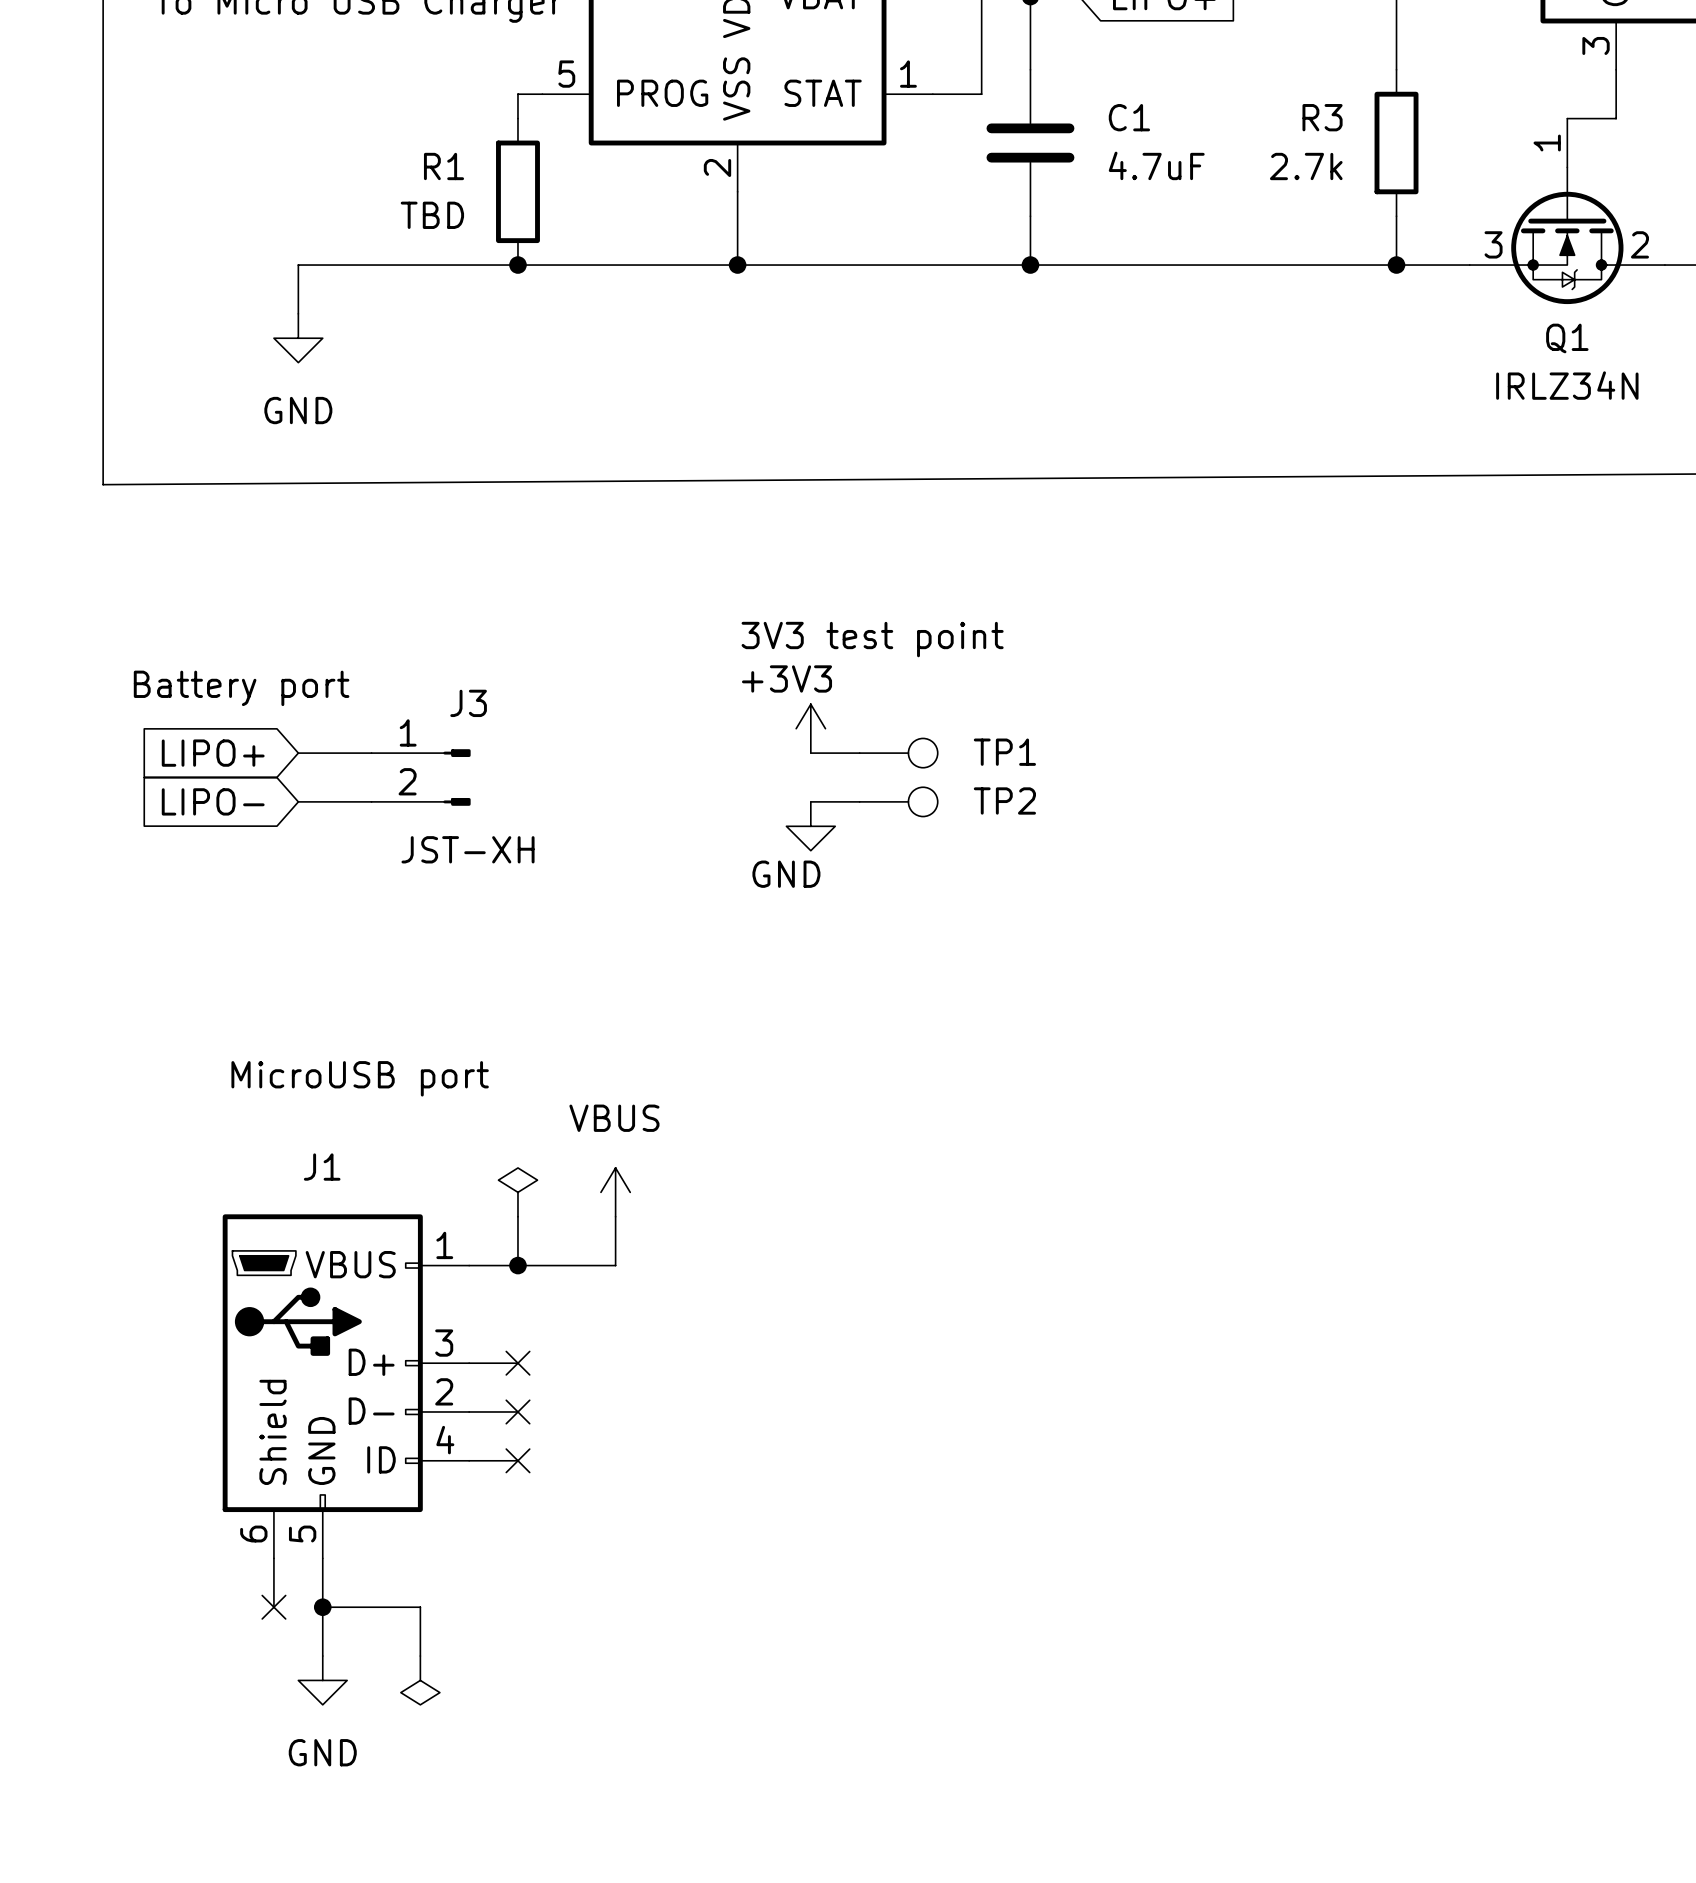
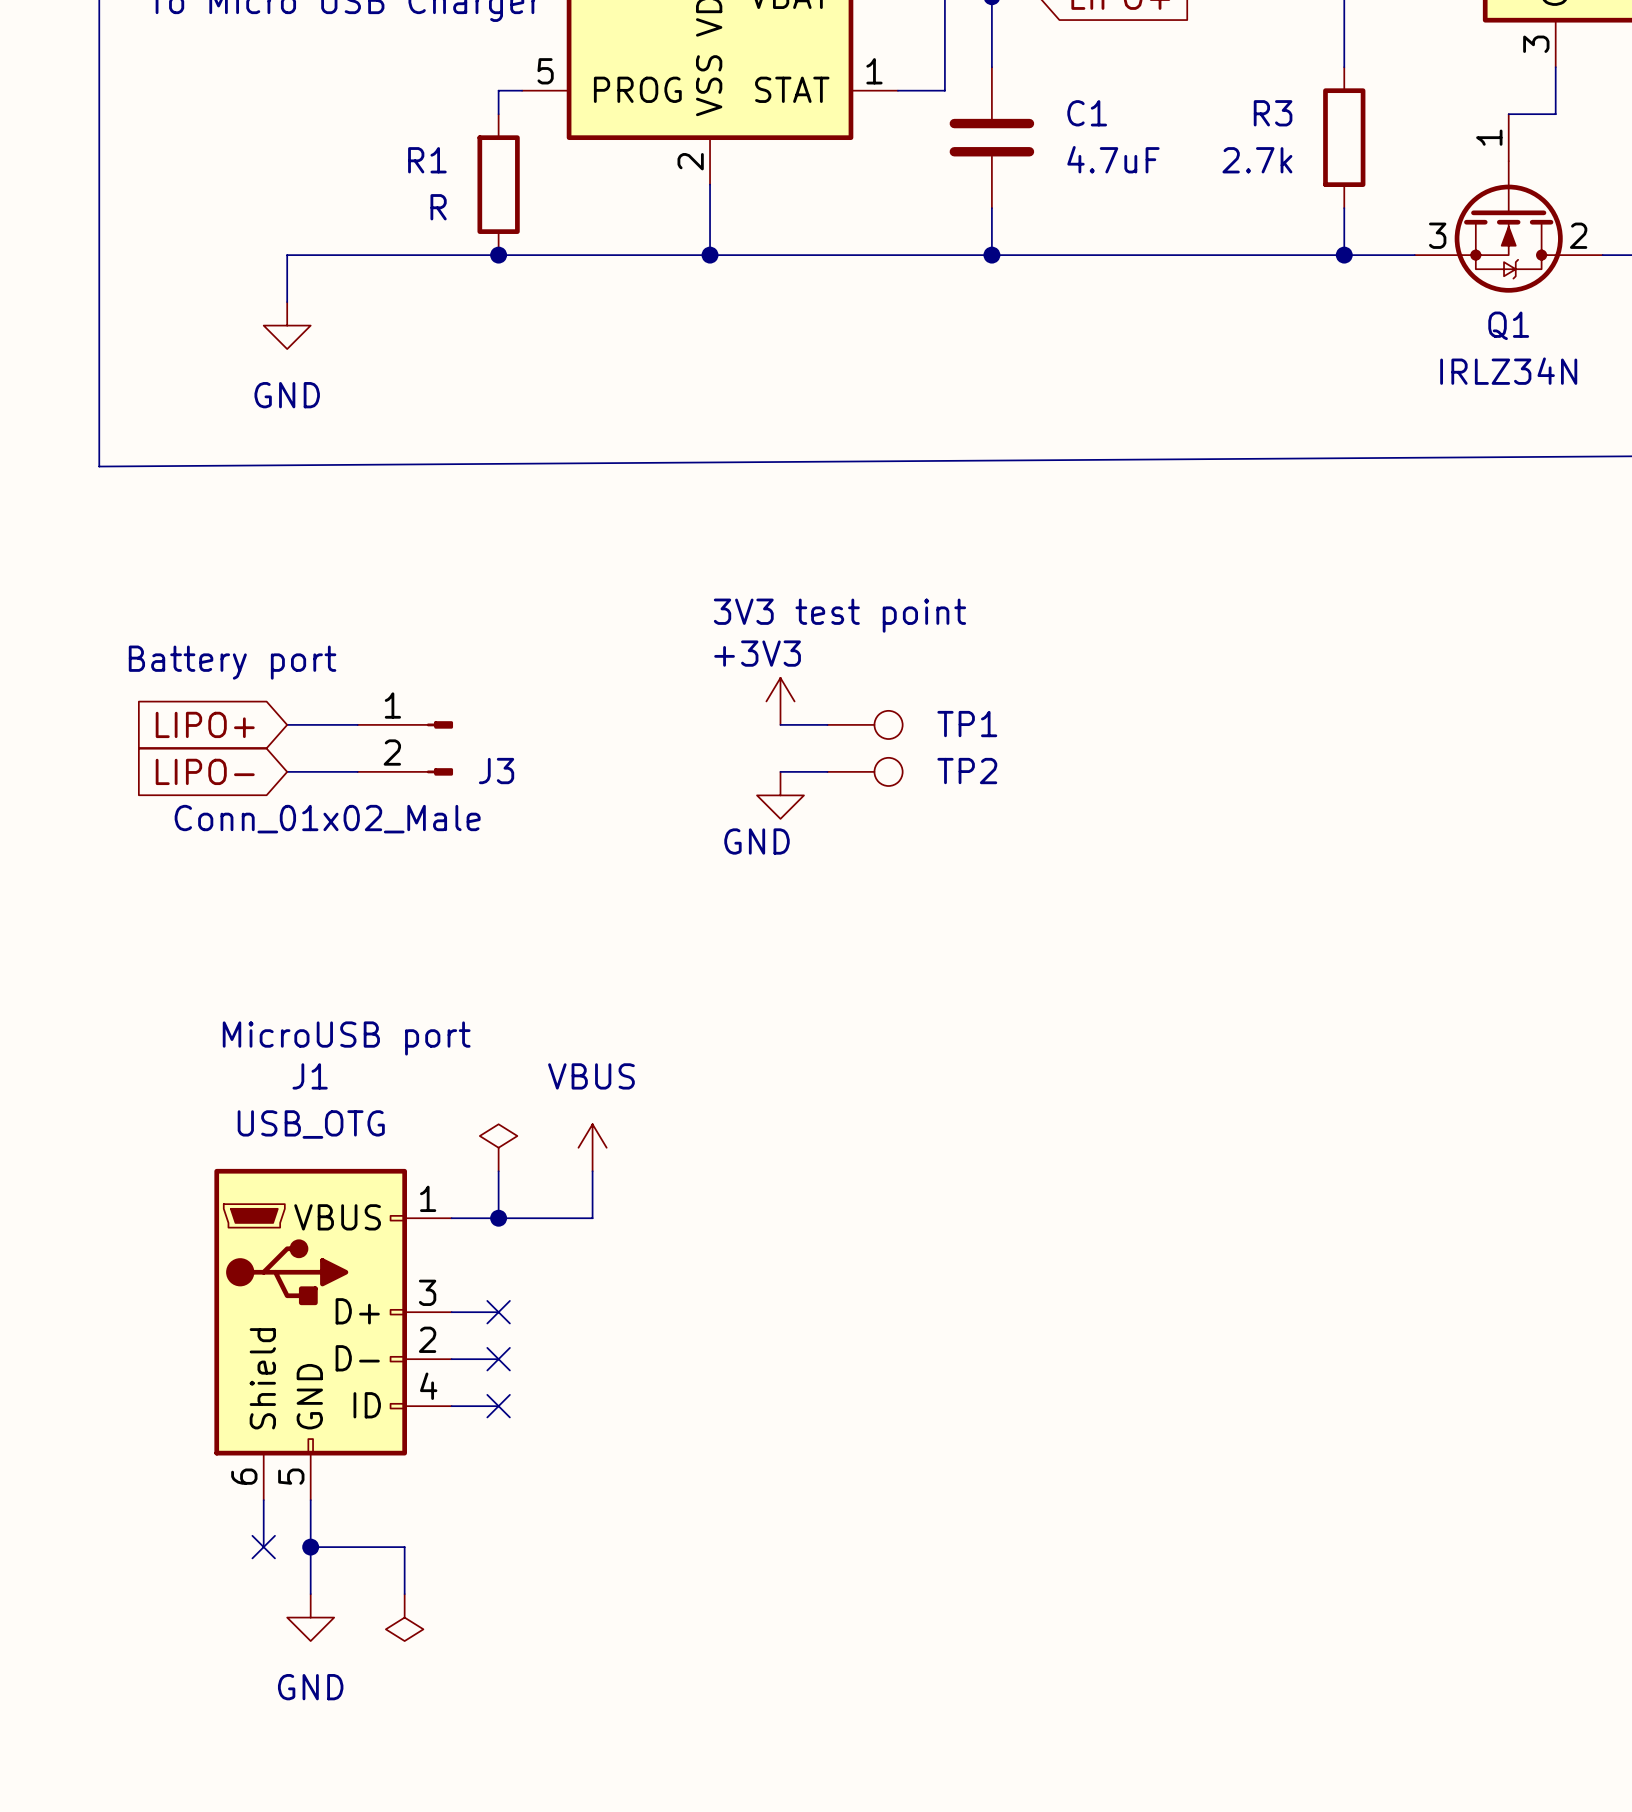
R1 value: TBD (432, 215) -> R (438, 207)
J3 name position: J3 (468, 703) -> J3 (496, 771)
J3 value: JST-XH (468, 849) -> Conn_01x02_Male (327, 819)
J1 name position: J1 (322, 1167) -> J1 (310, 1076)
J1 value: none -> USB_OTG (311, 1124)

